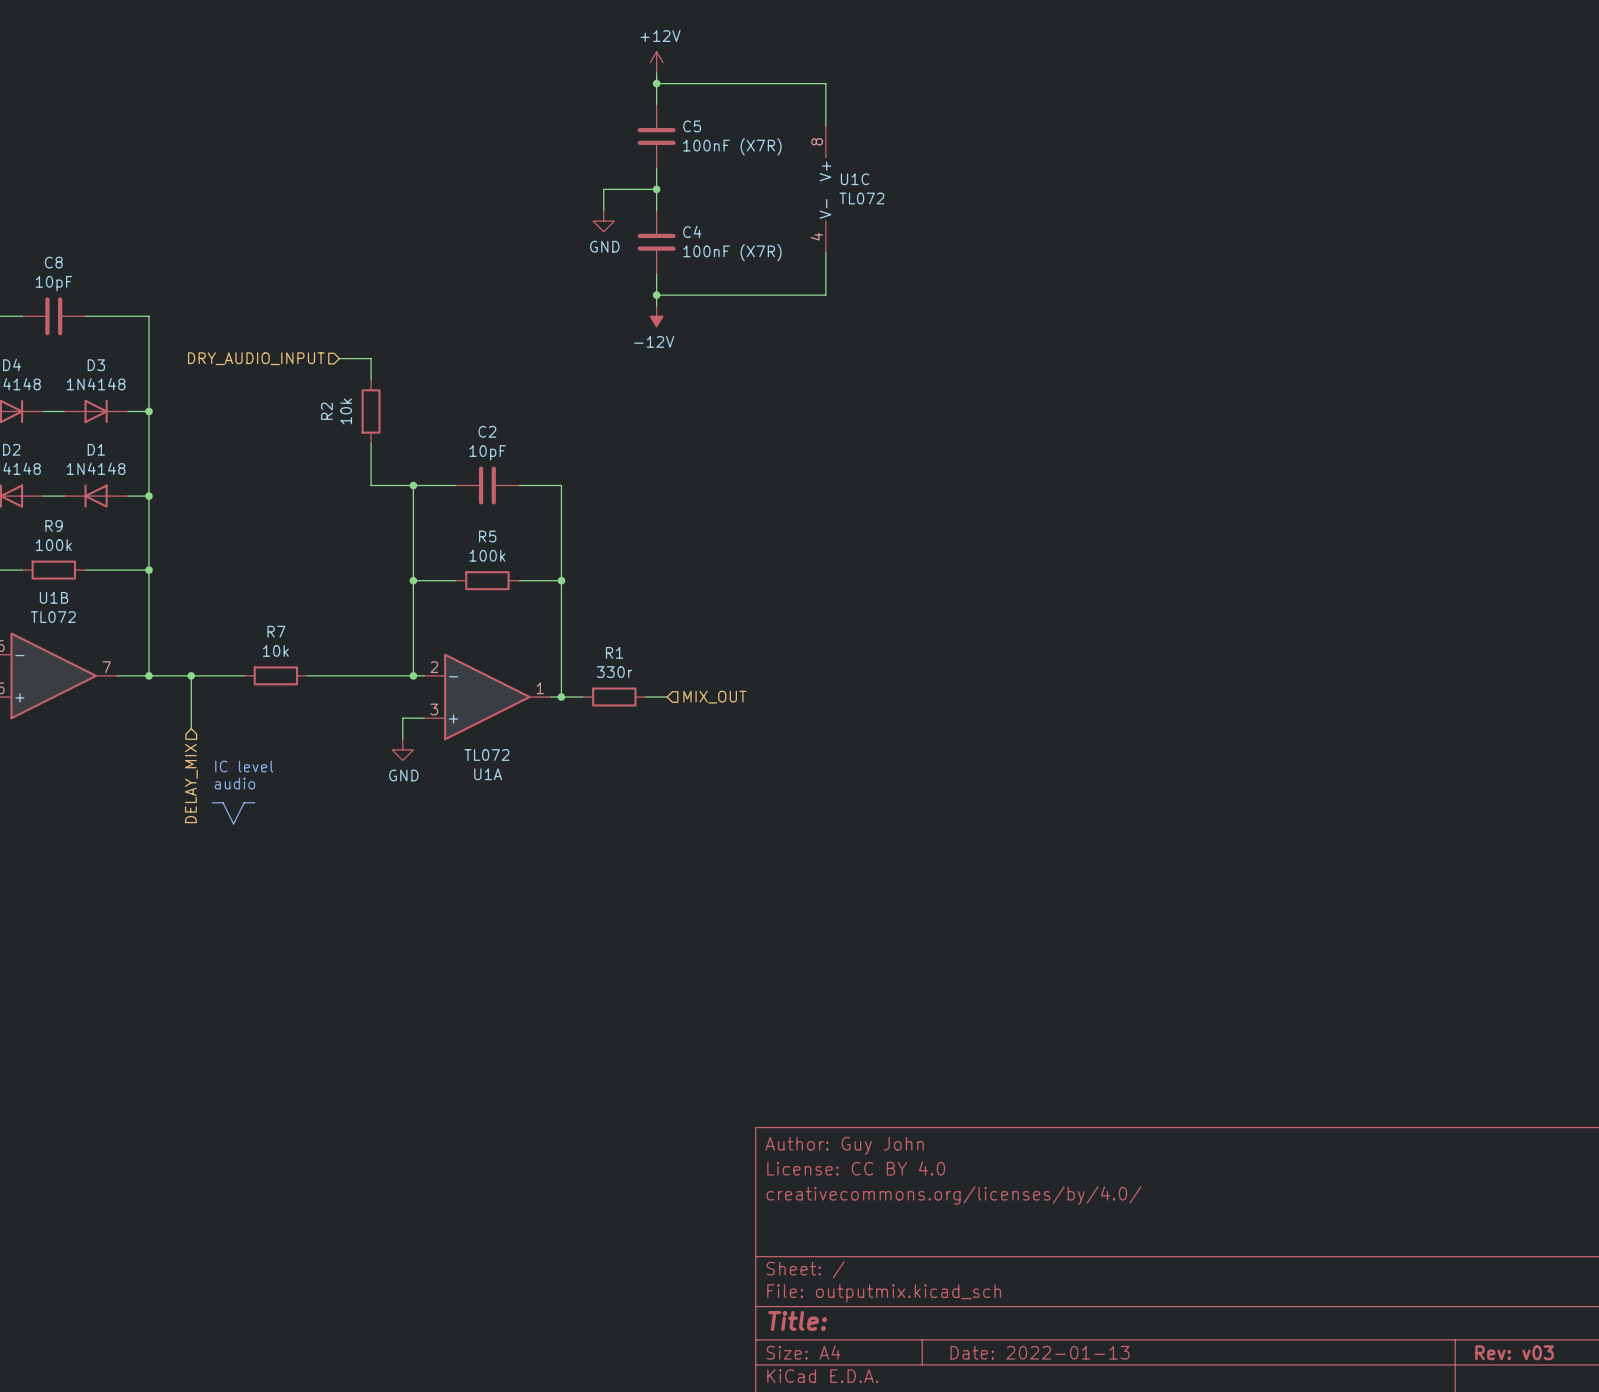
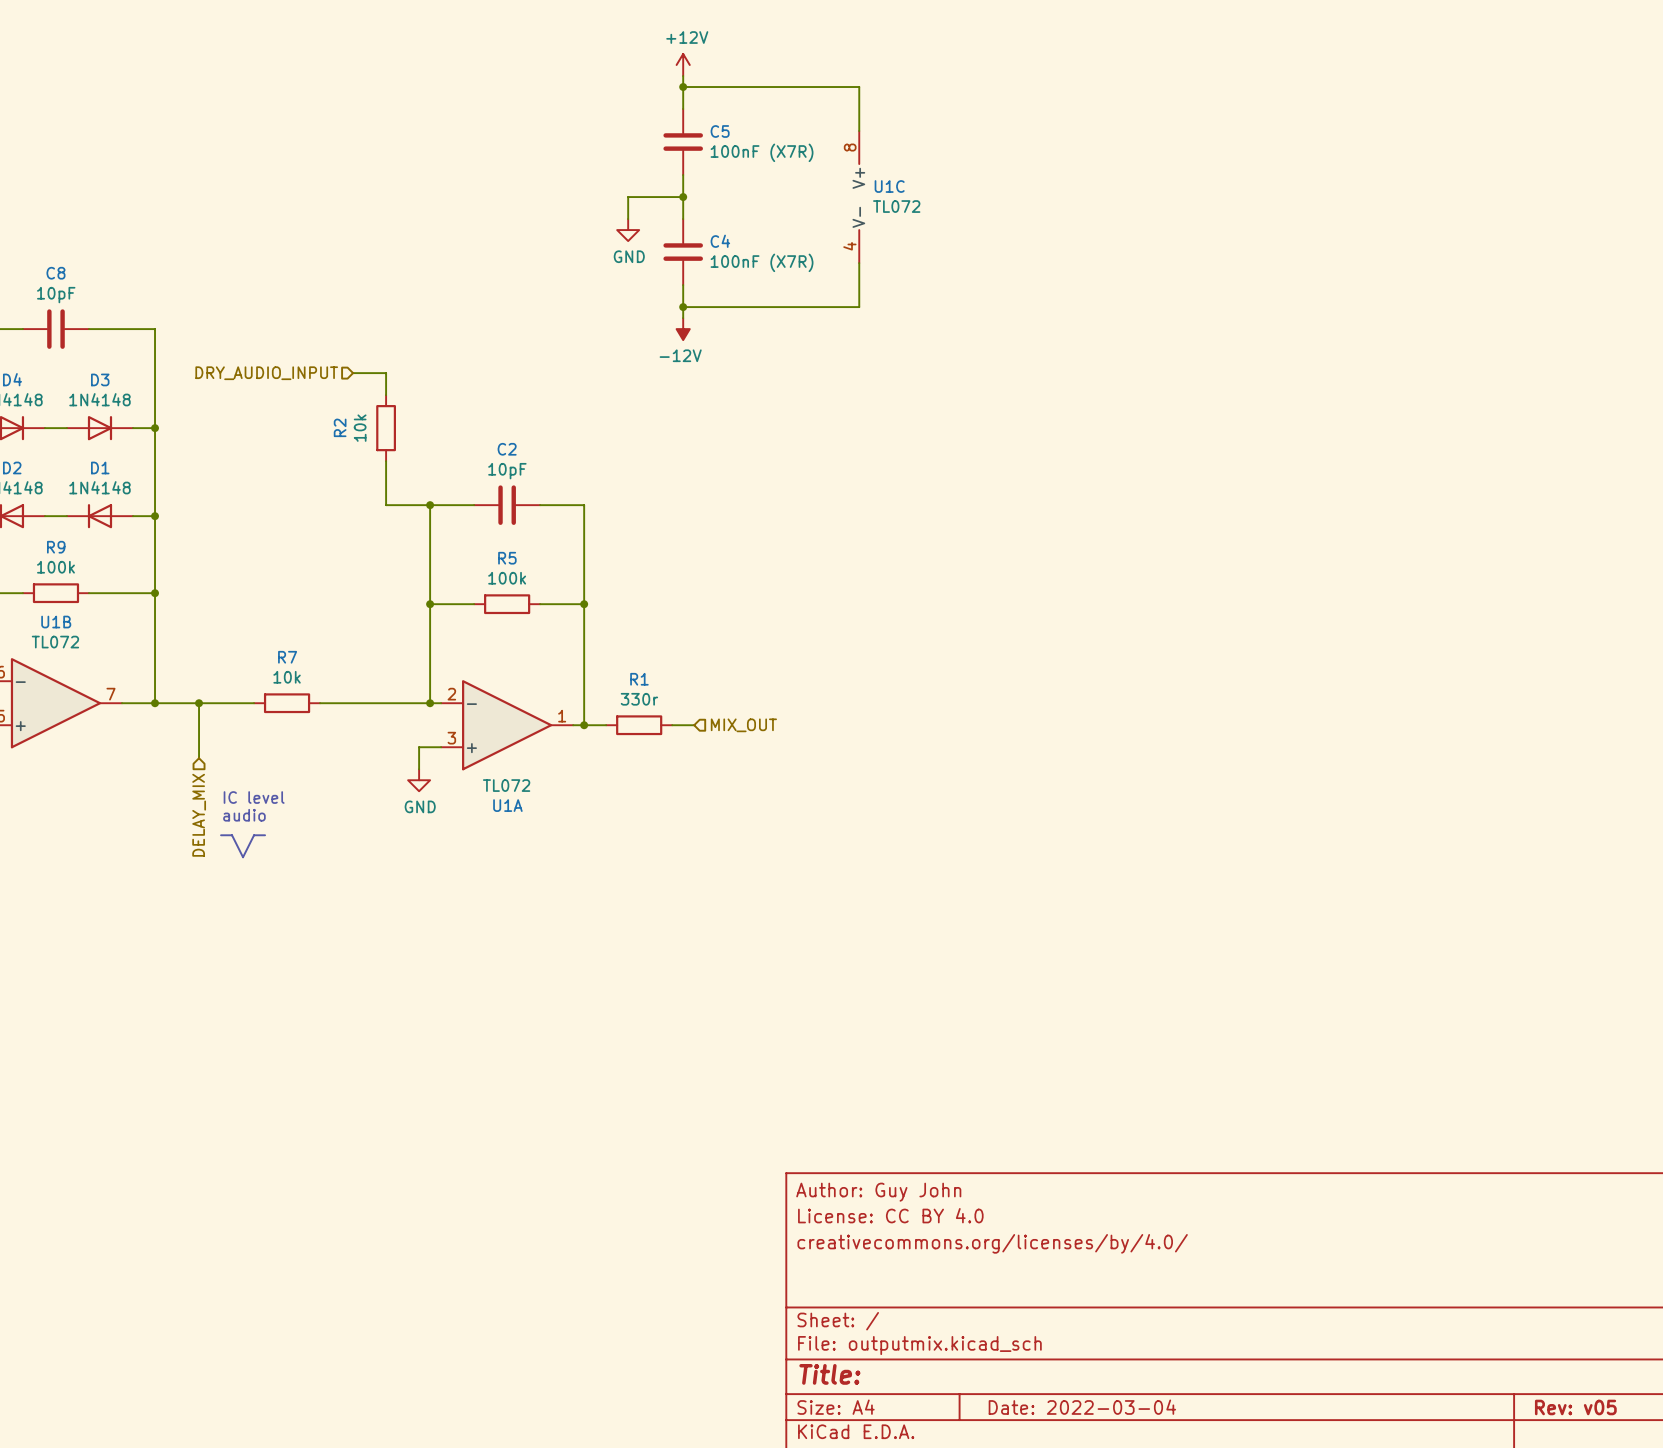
title block: Date: 2022-01-13 (1039, 1352) -> Date: 2022-03-04 (1082, 1407)
title block: Rev: v03 (1514, 1352) -> Rev: v05 (1575, 1407)

